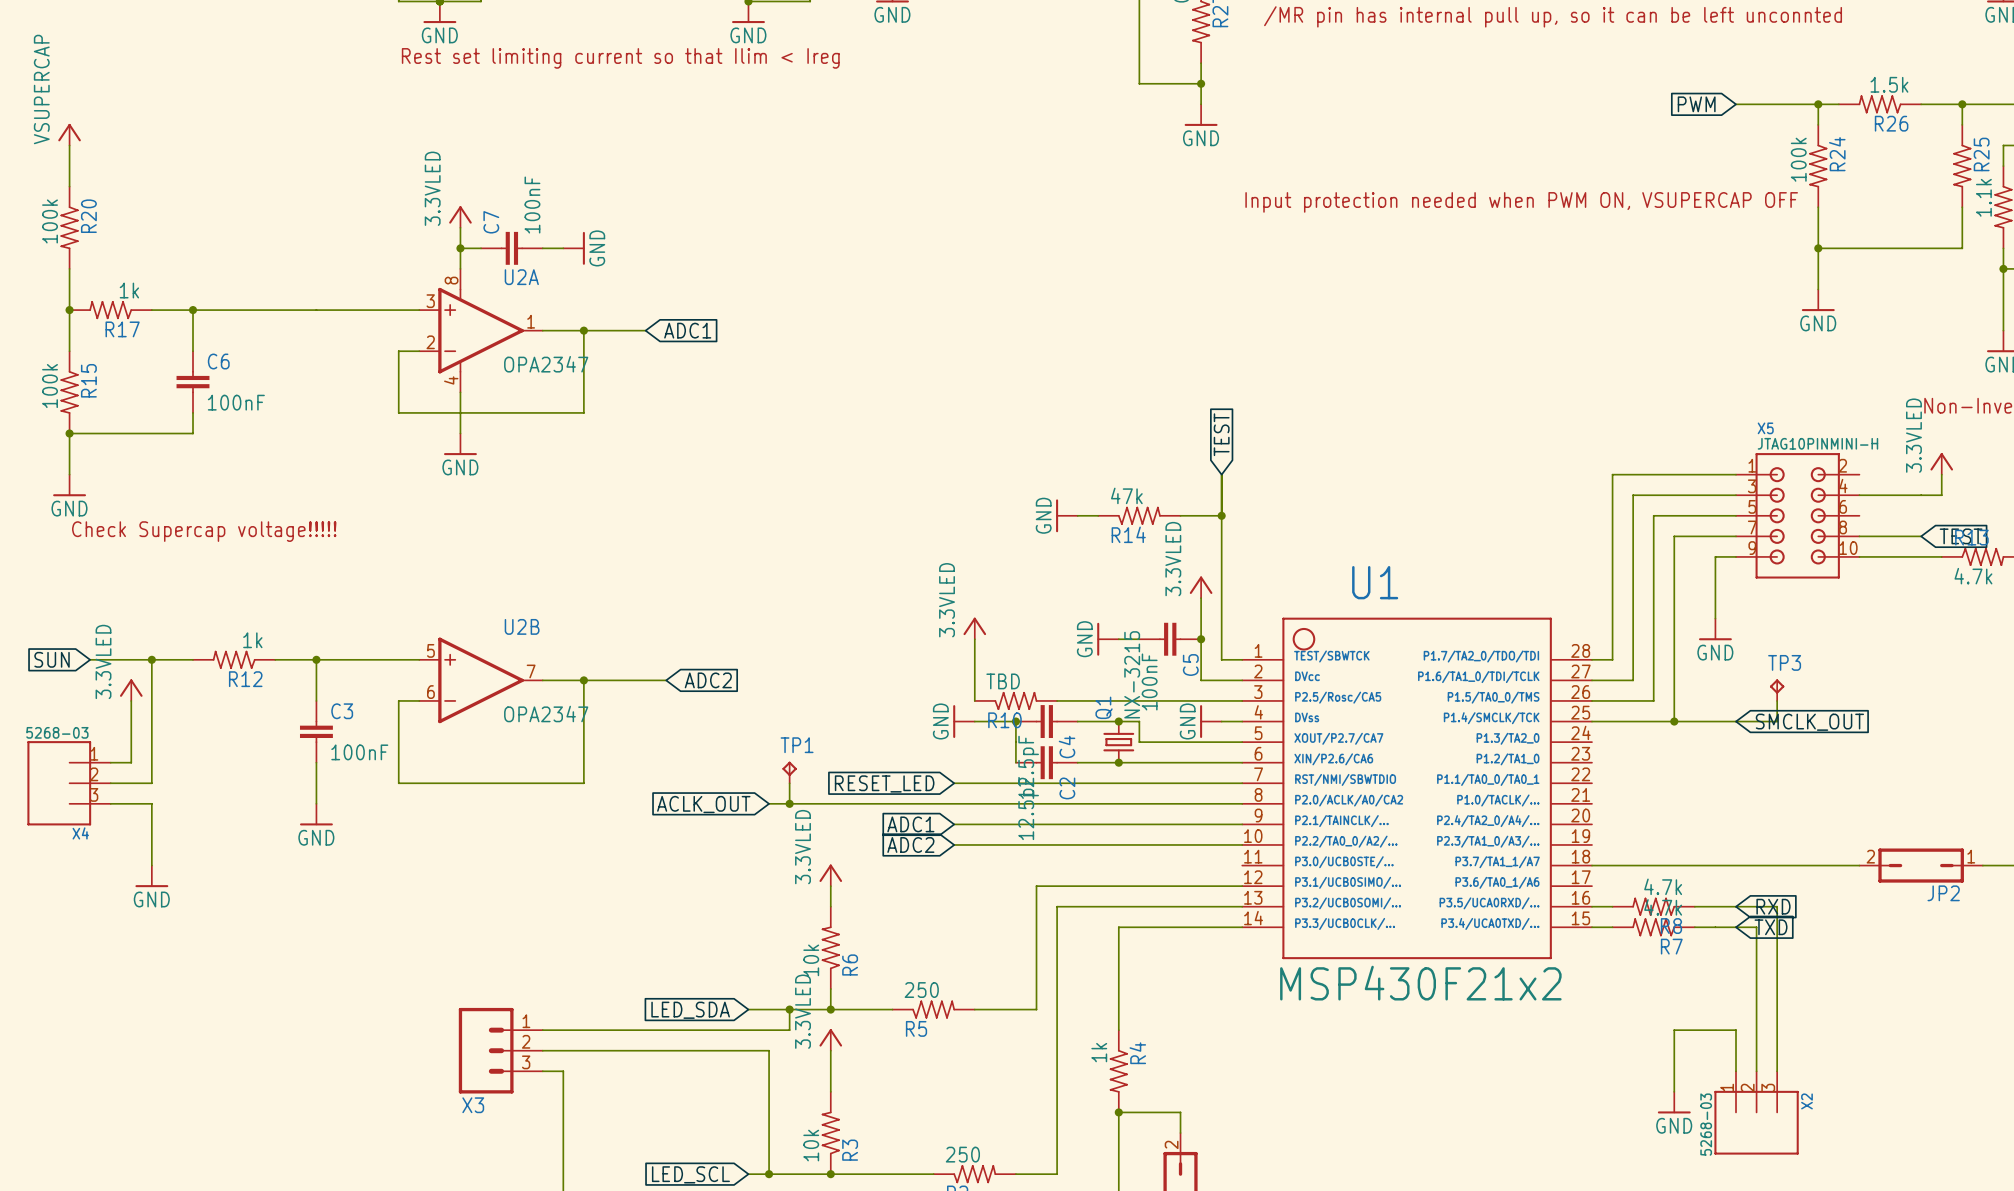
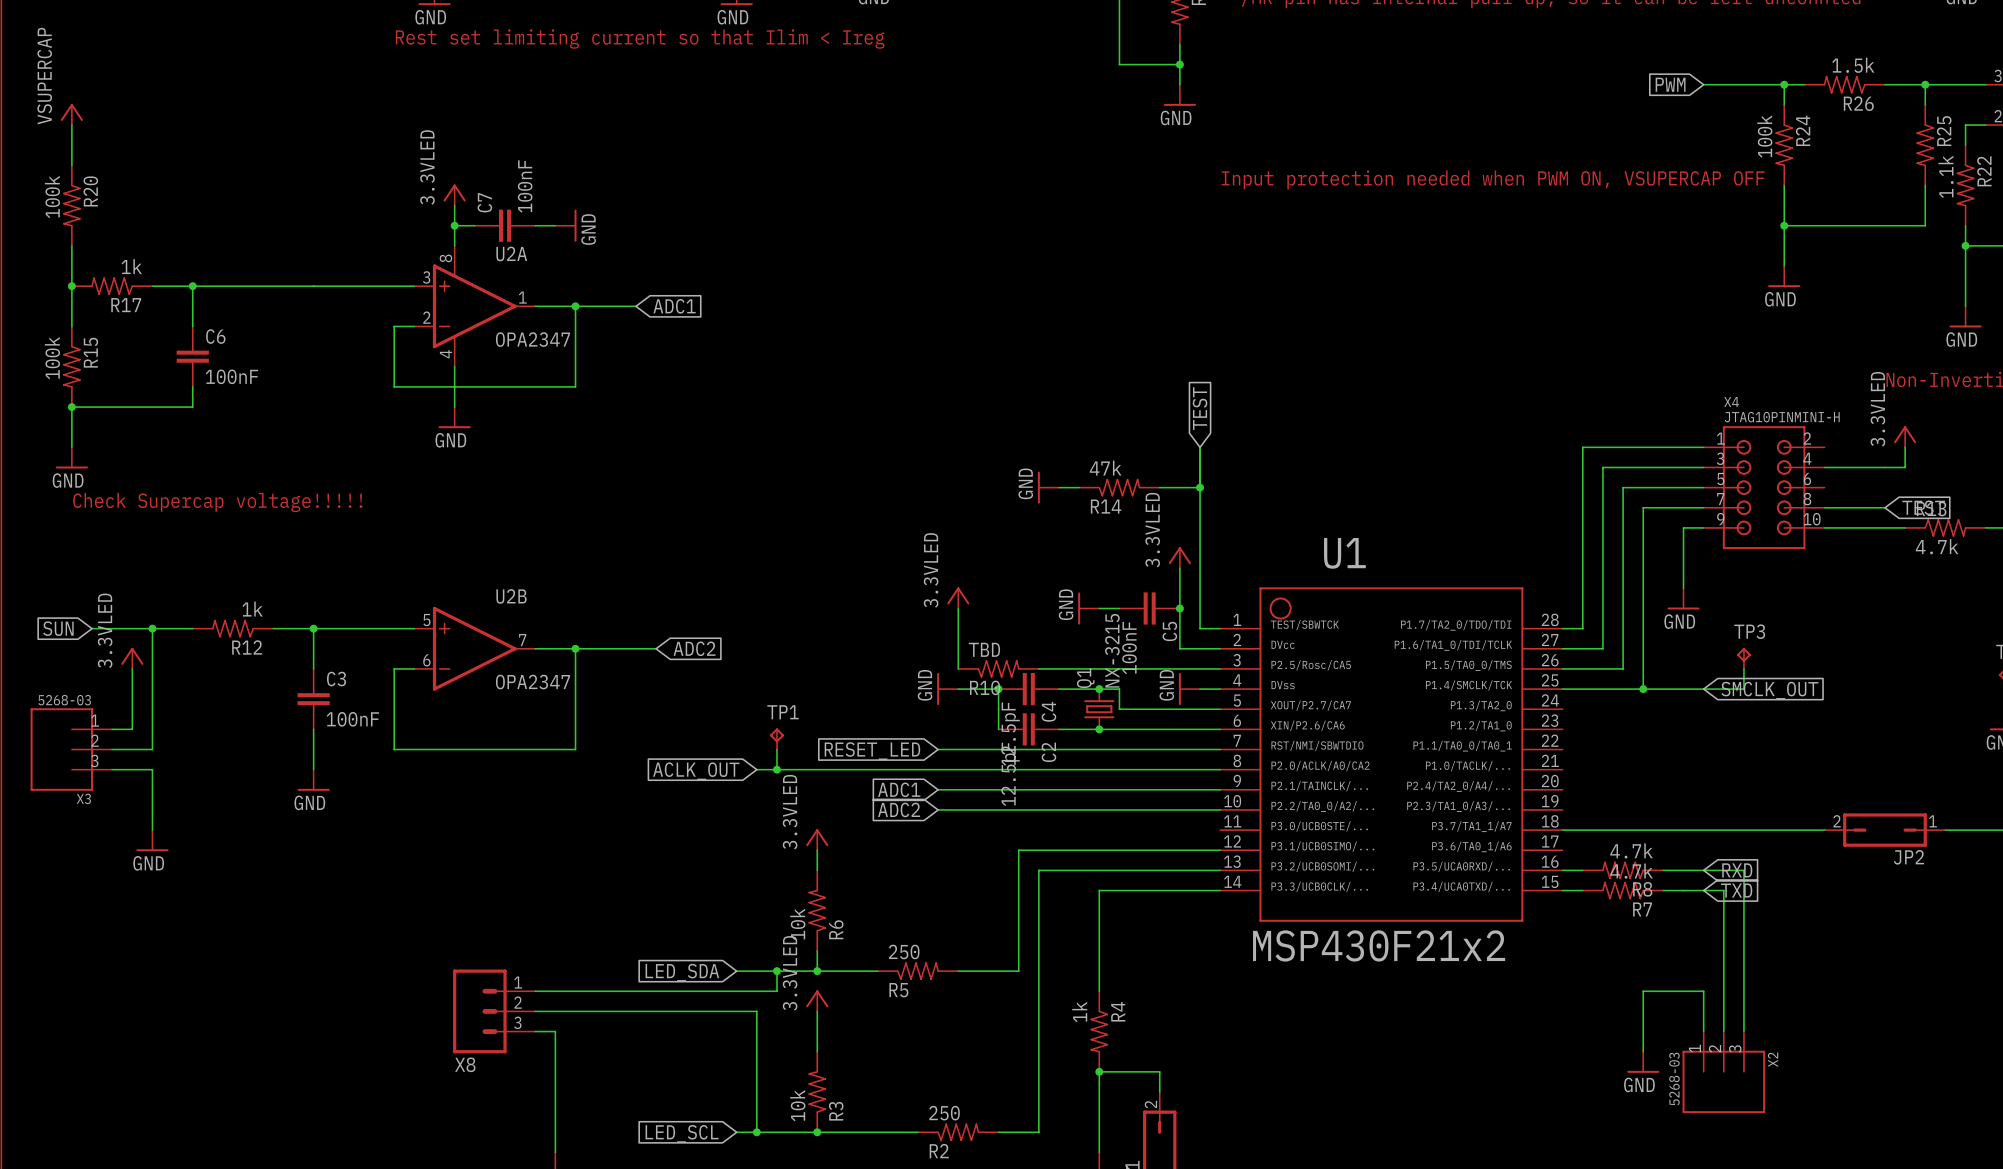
X5 name: X5 (1765, 428) -> X4 (1731, 402)
X4 name: X4 (80, 833) -> X3 (83, 798)
X3 name: X3 (473, 1105) -> X8 (465, 1064)

